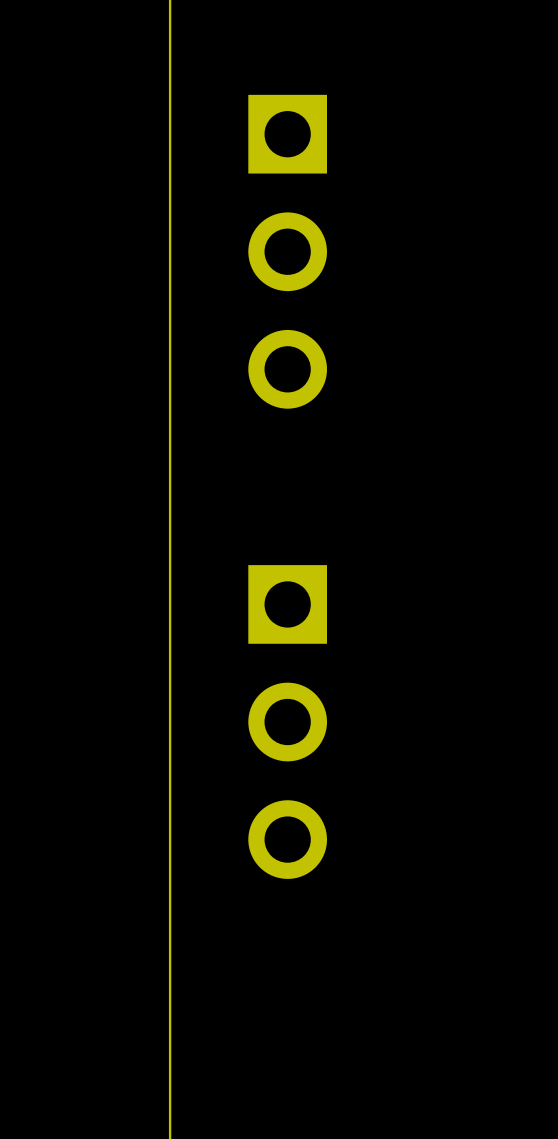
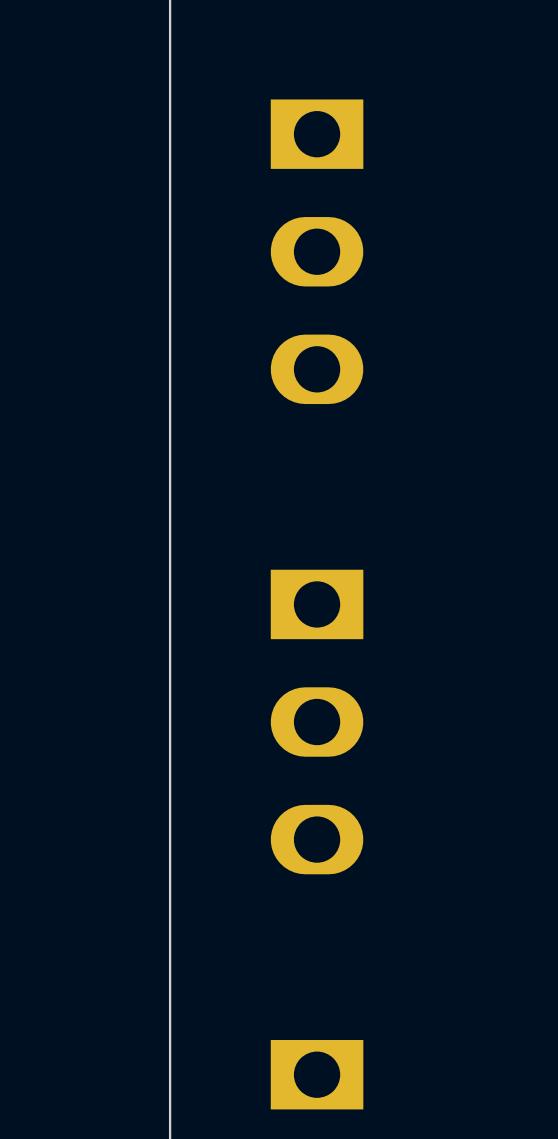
part footprint: [248, 94, 328, 409] -> [270, 99, 364, 405]
part footprint: [248, 565, 328, 879] -> [270, 569, 364, 875]
part: none -> (317, 1074)

